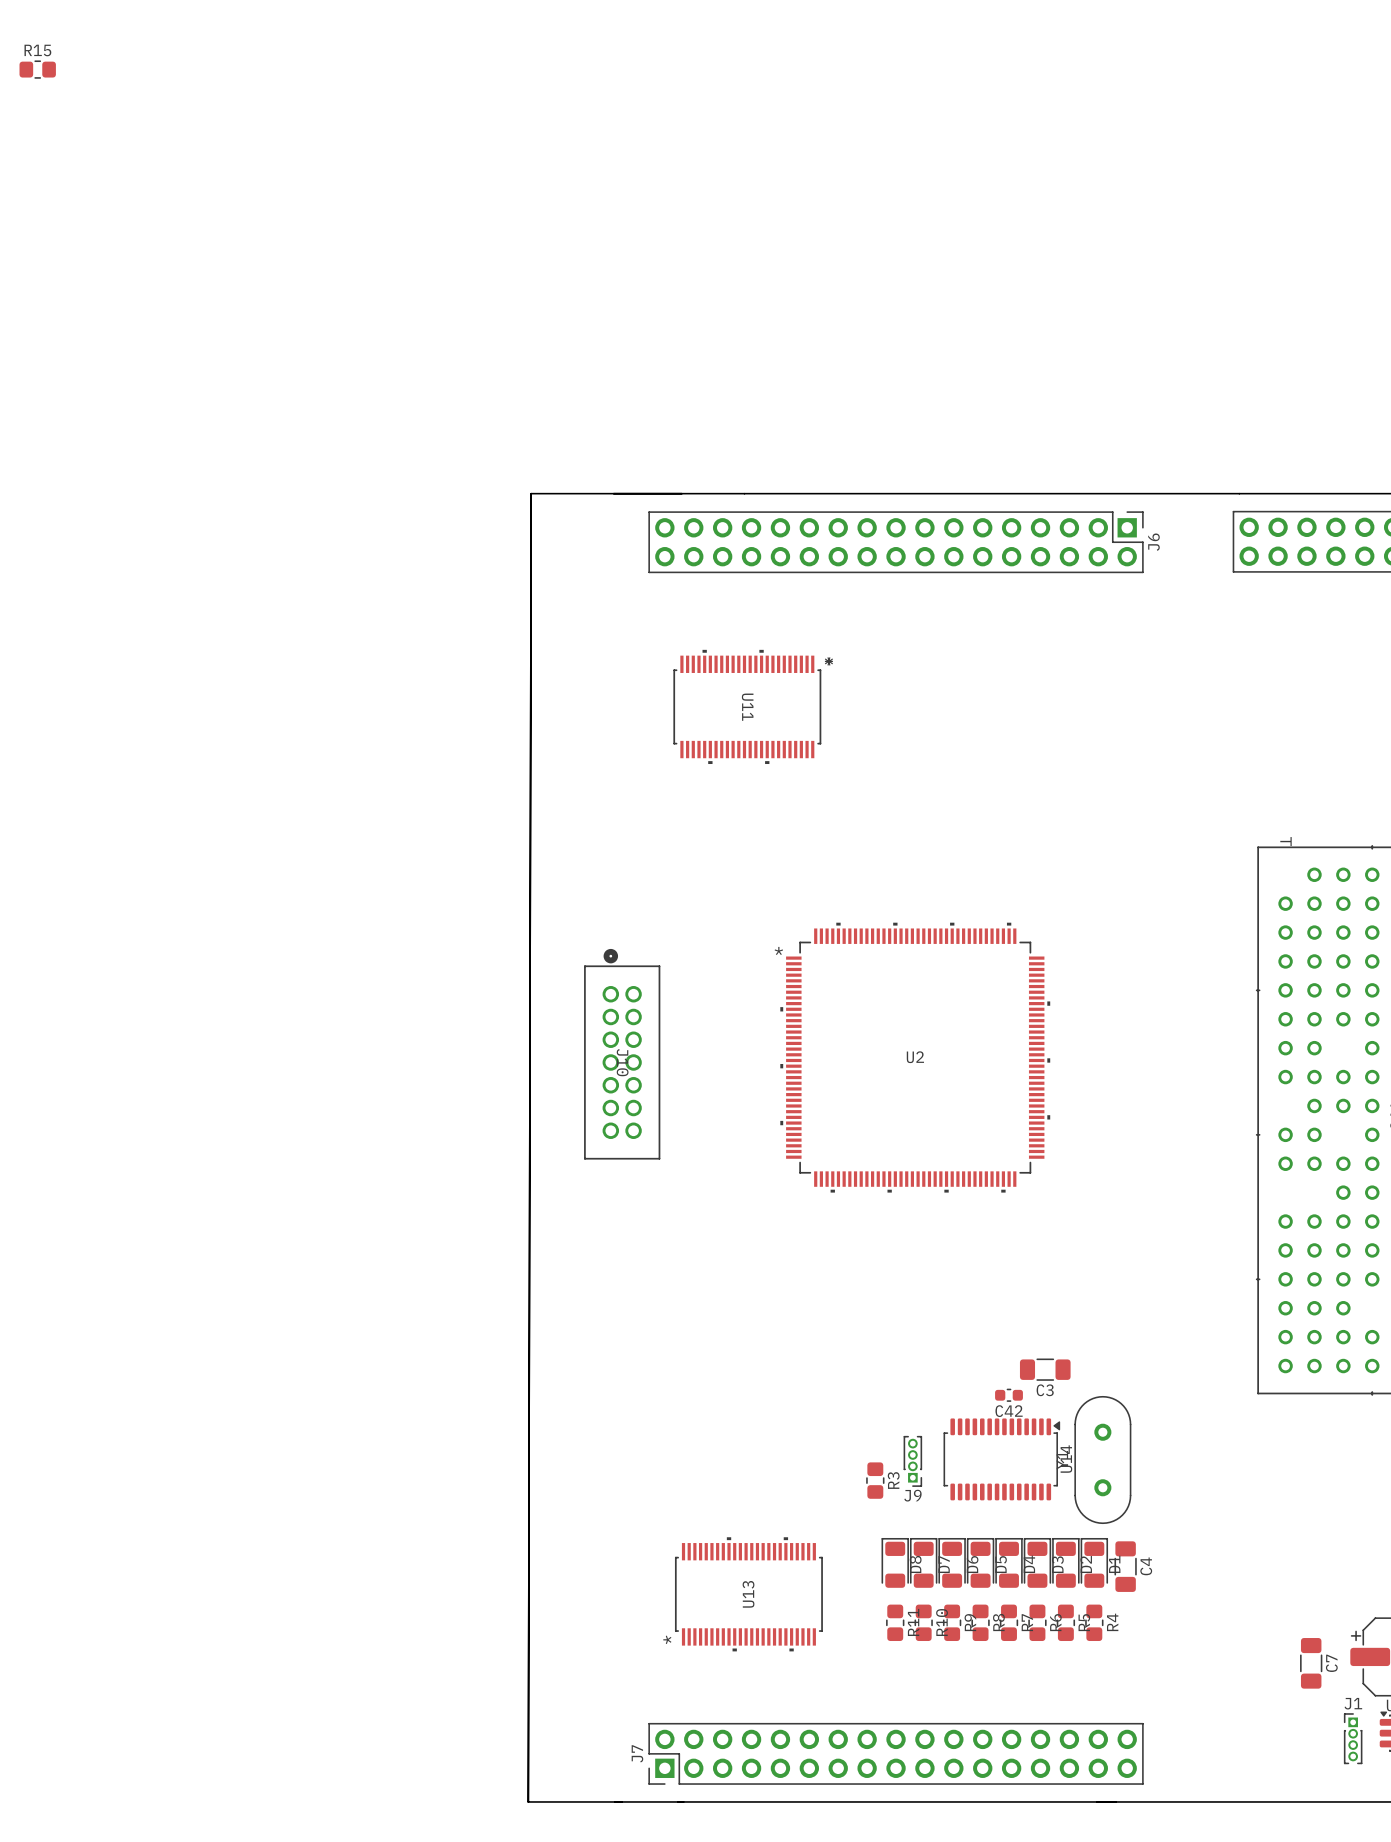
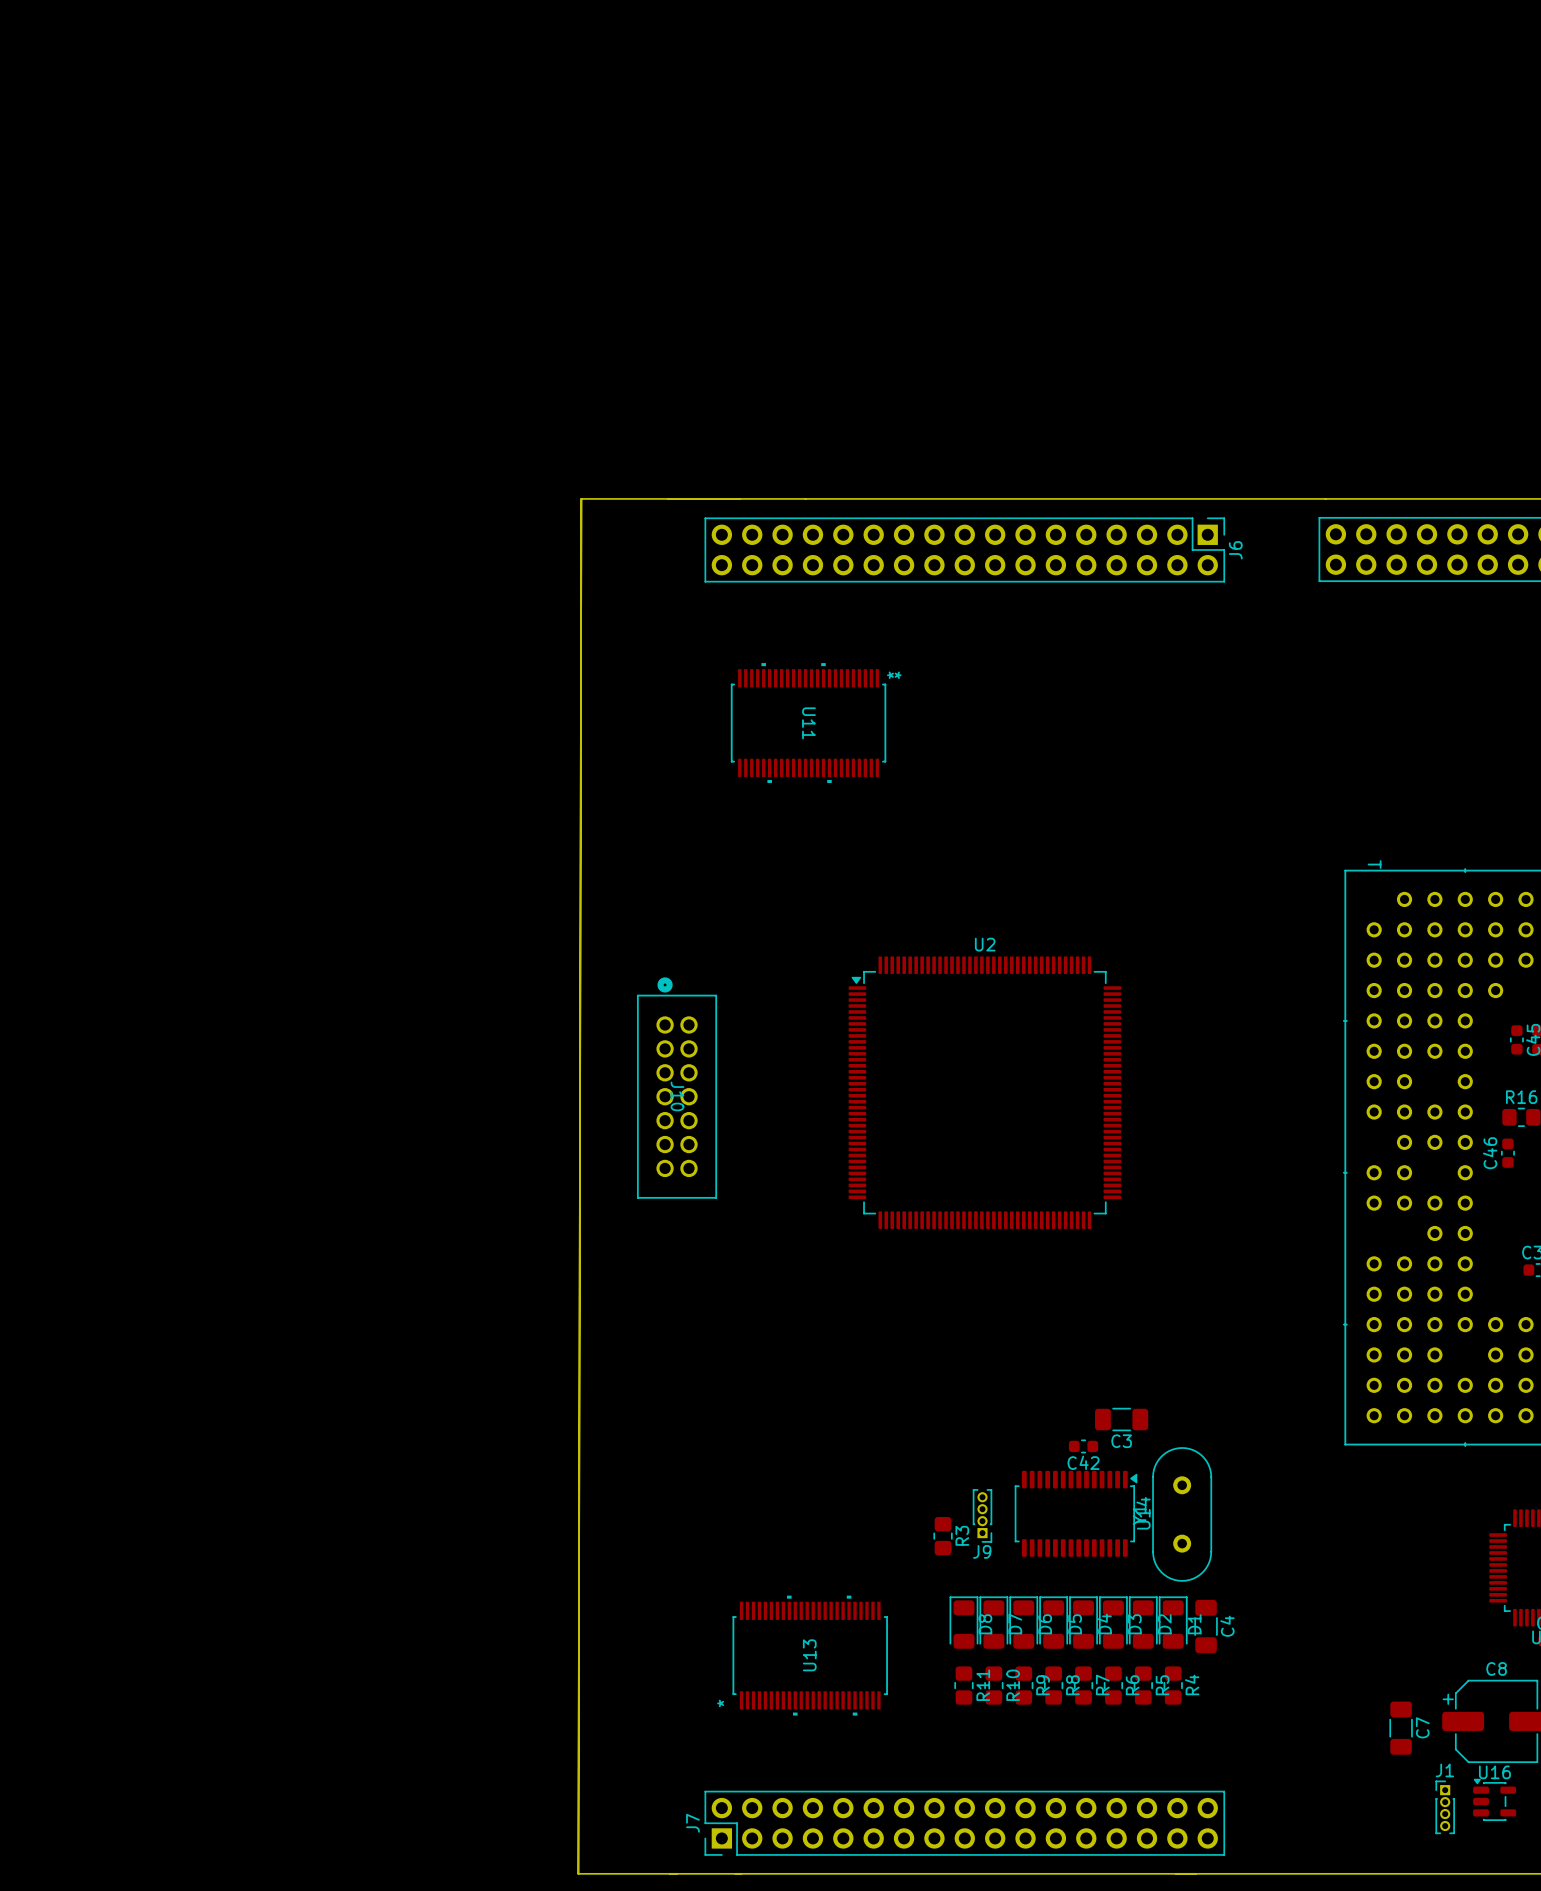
R15: (37, 69) -> none
U2 footprint: [780, 922, 1051, 1193] -> [848, 956, 1122, 1229]
U2 name position: U2 (915, 1057) -> U2 (985, 944)

